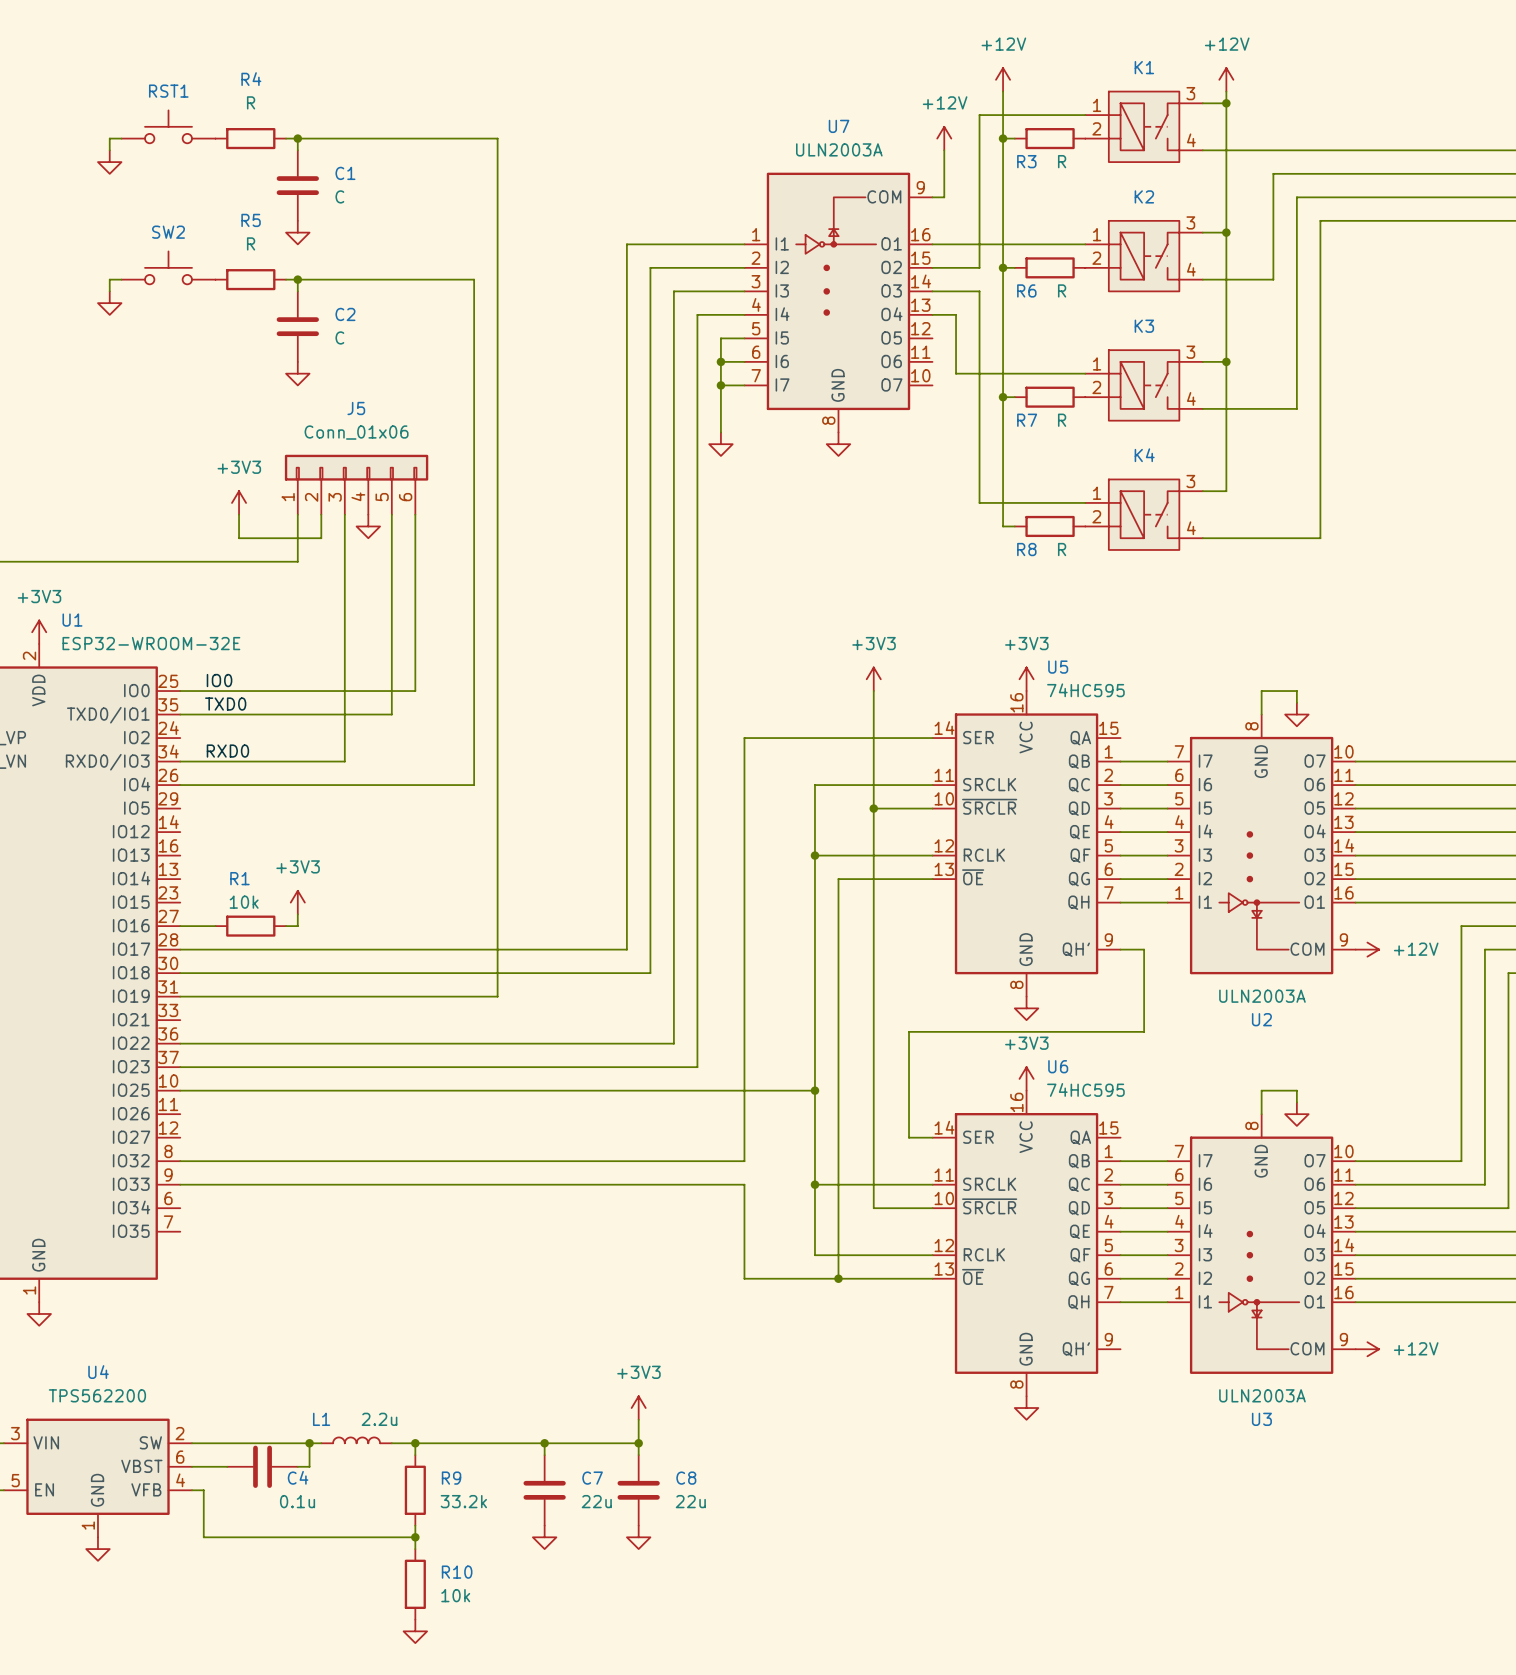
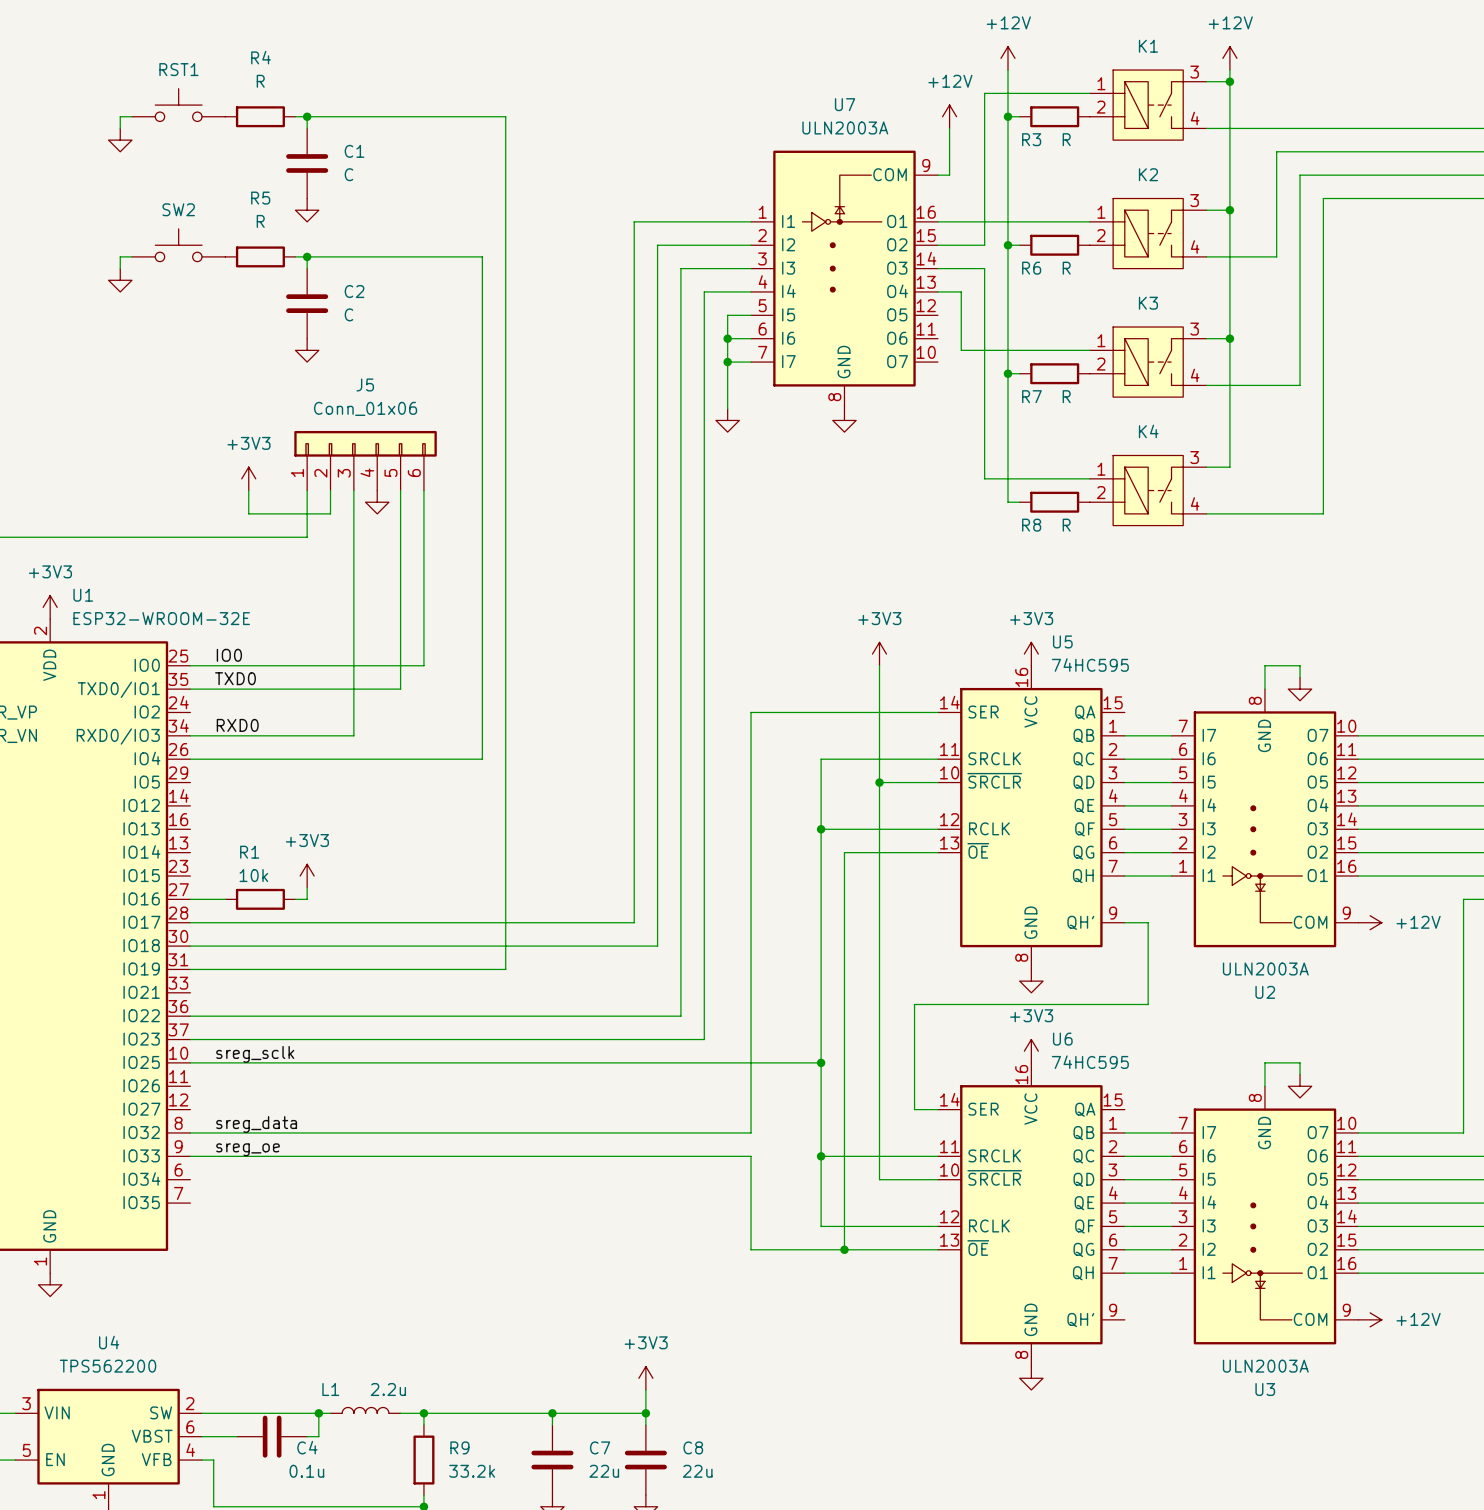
label: none -> sreg_sclk (255, 1054)
label: none -> sreg_data (256, 1124)
label: none -> sreg_oe (248, 1149)

